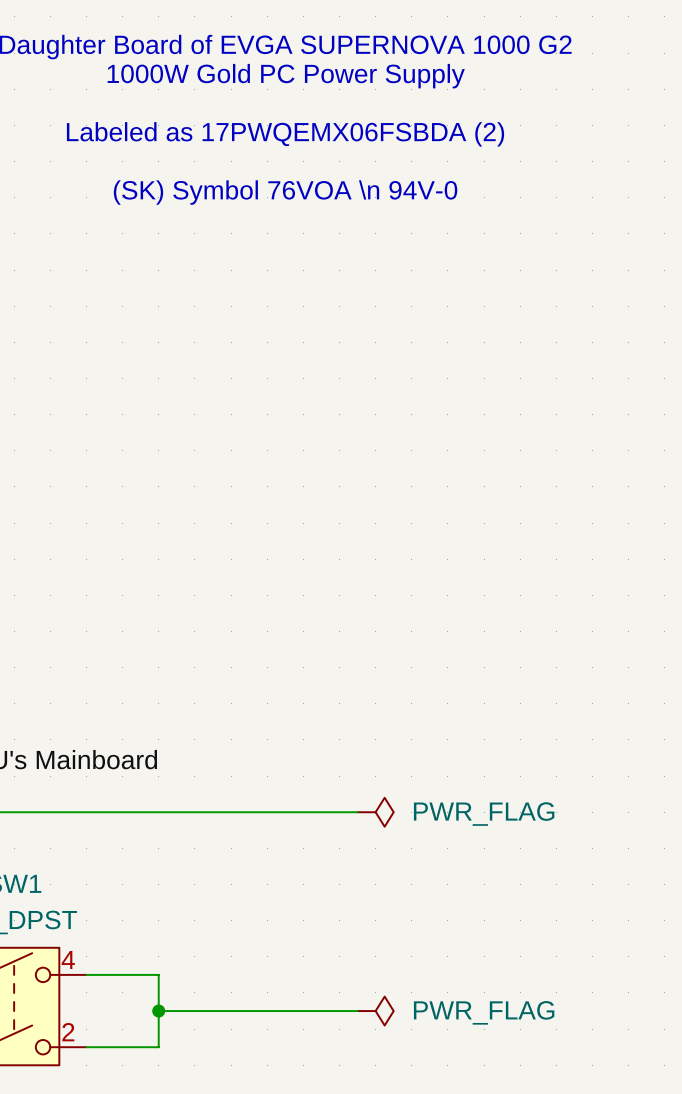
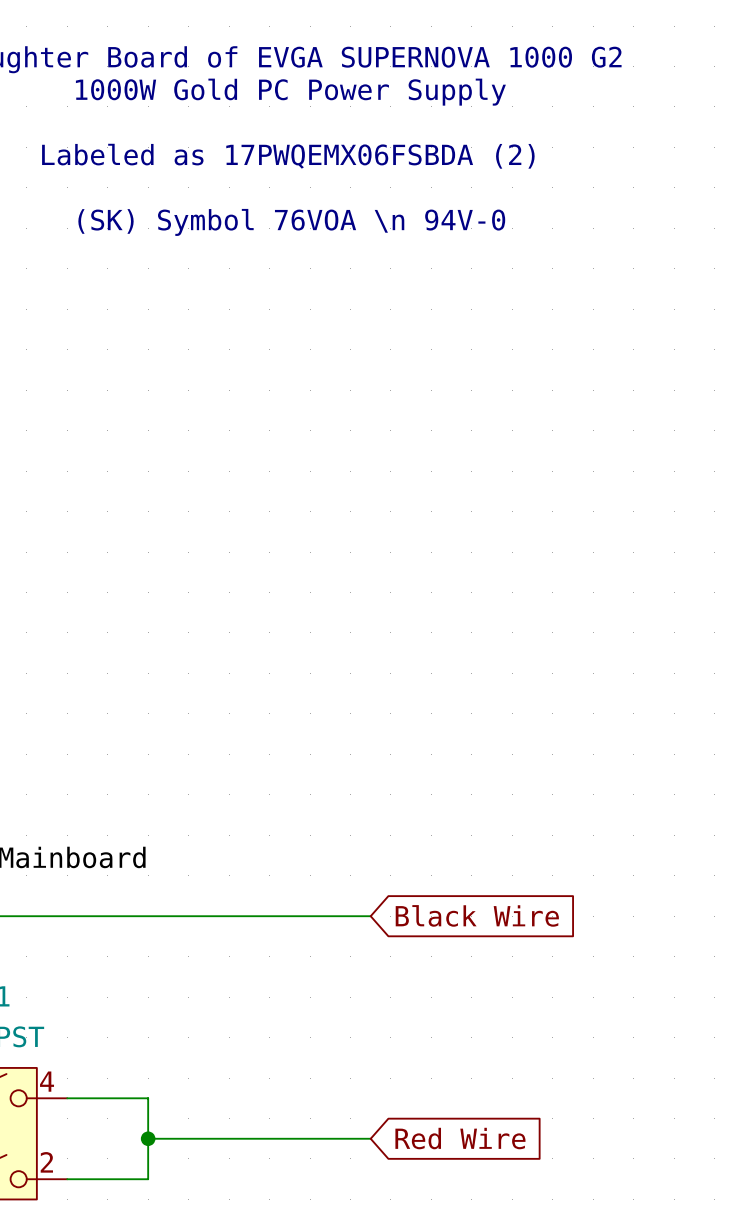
global label: none -> Black Wire (477, 915)
power symbol: PWR_FLAG (375, 812) -> none
global label: none -> Red Wire (460, 1138)
power symbol: PWR_FLAG (375, 1011) -> none

